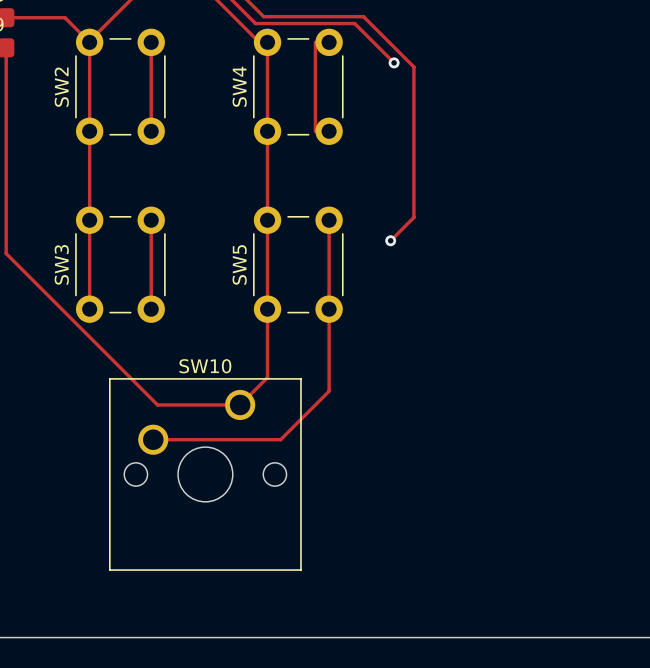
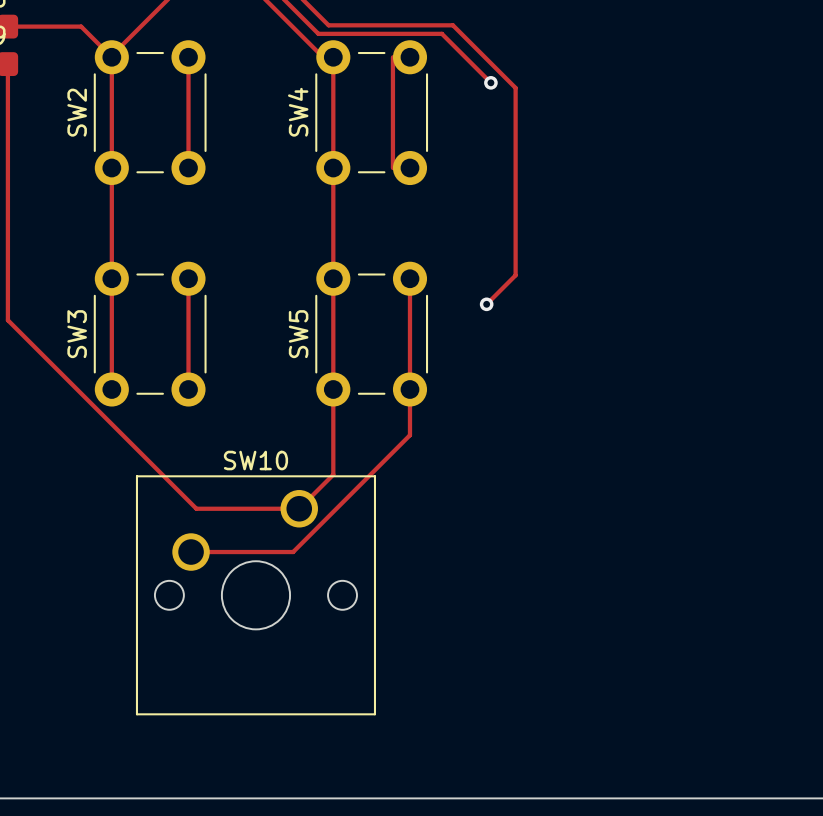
track: (329, 345) (329, 391) (280, 439) (235, 439) -> (409, 435) (293, 552)

